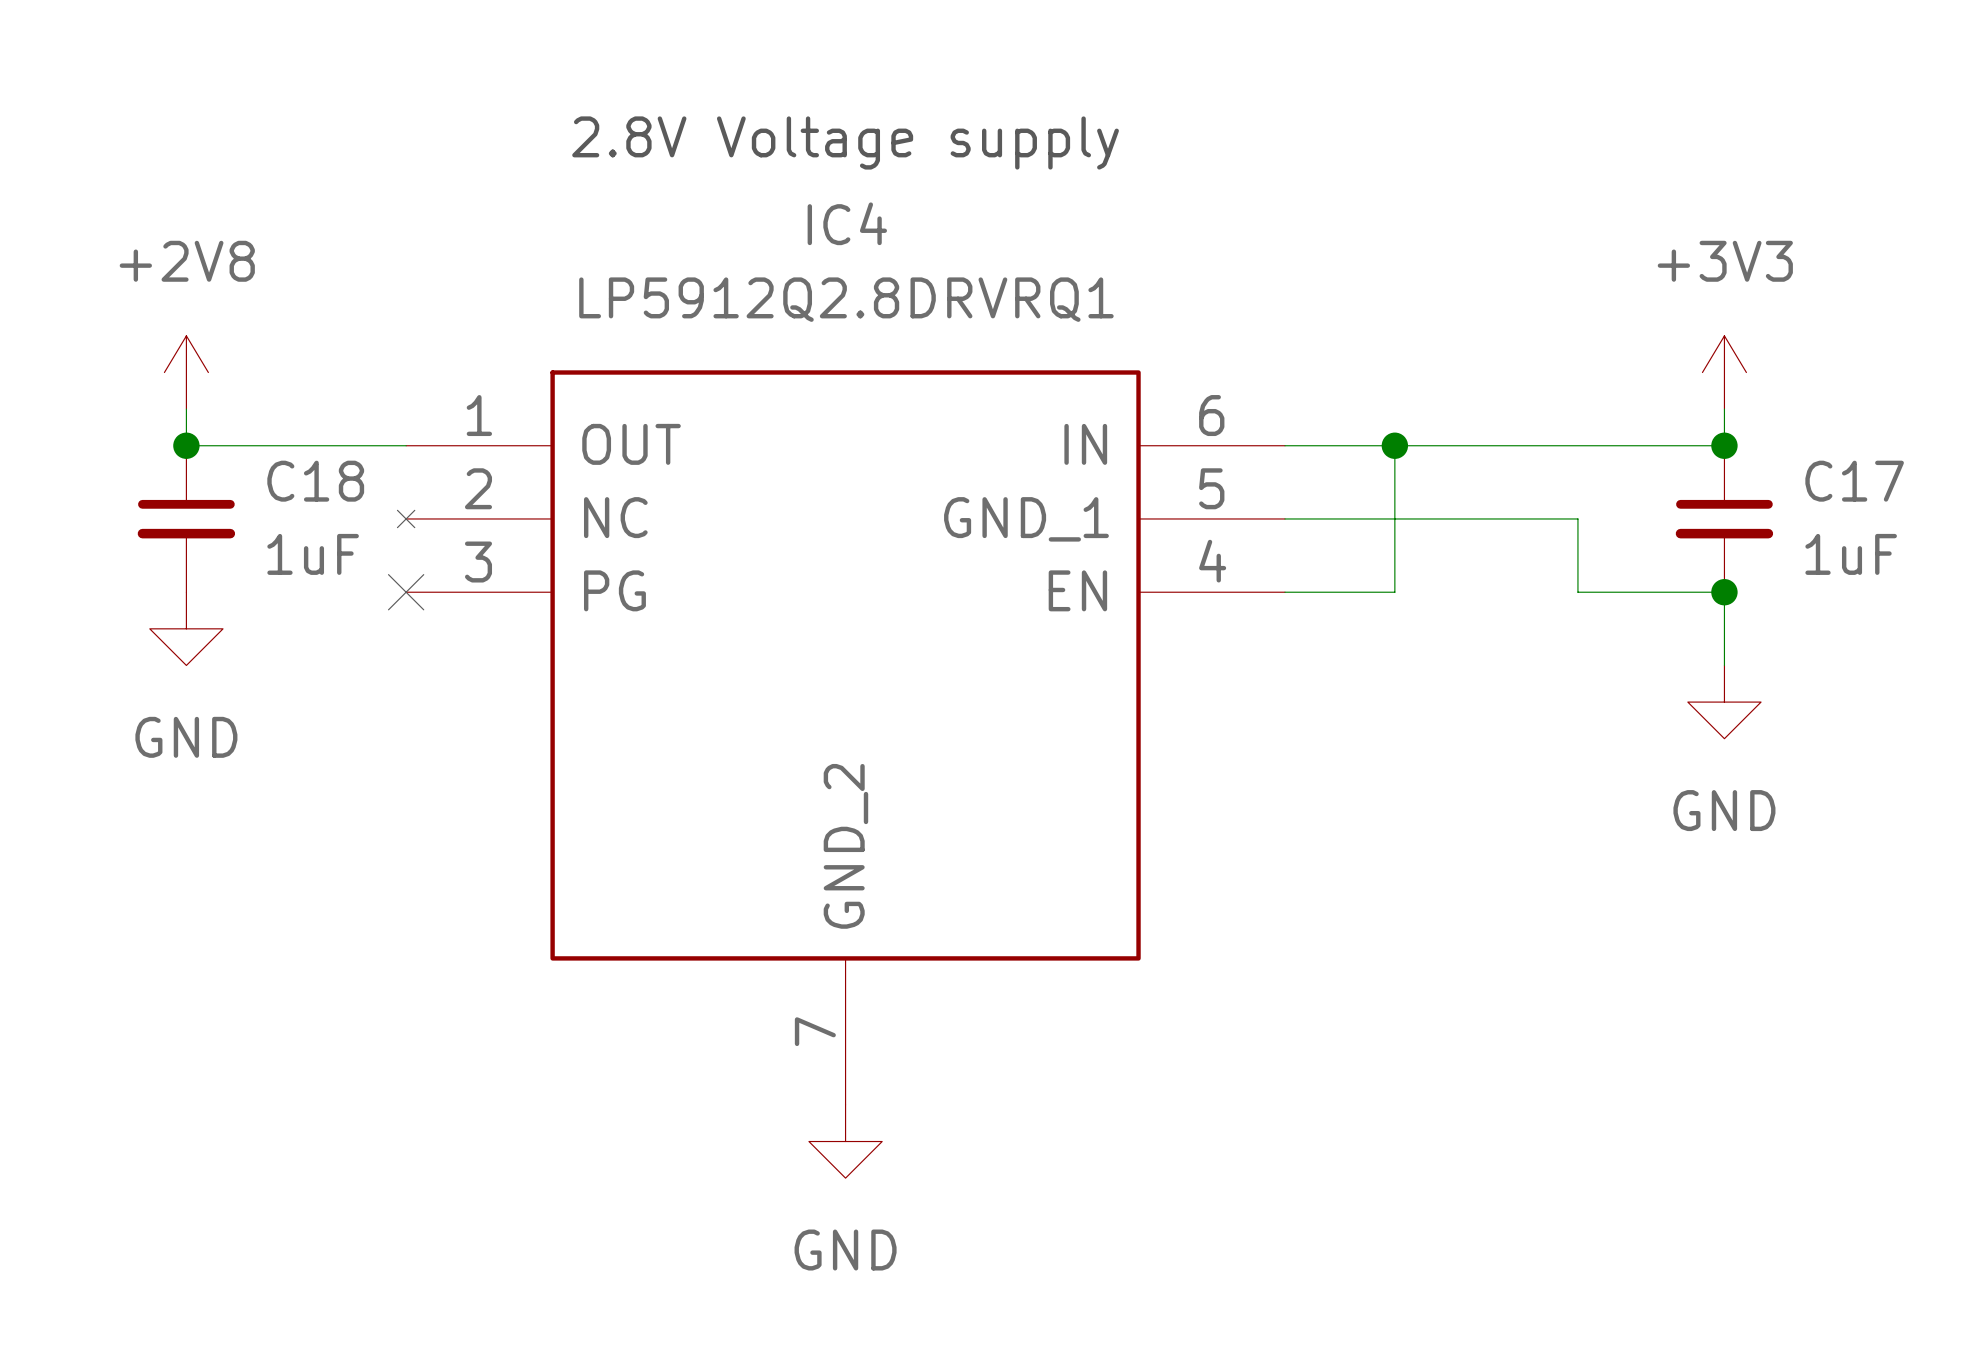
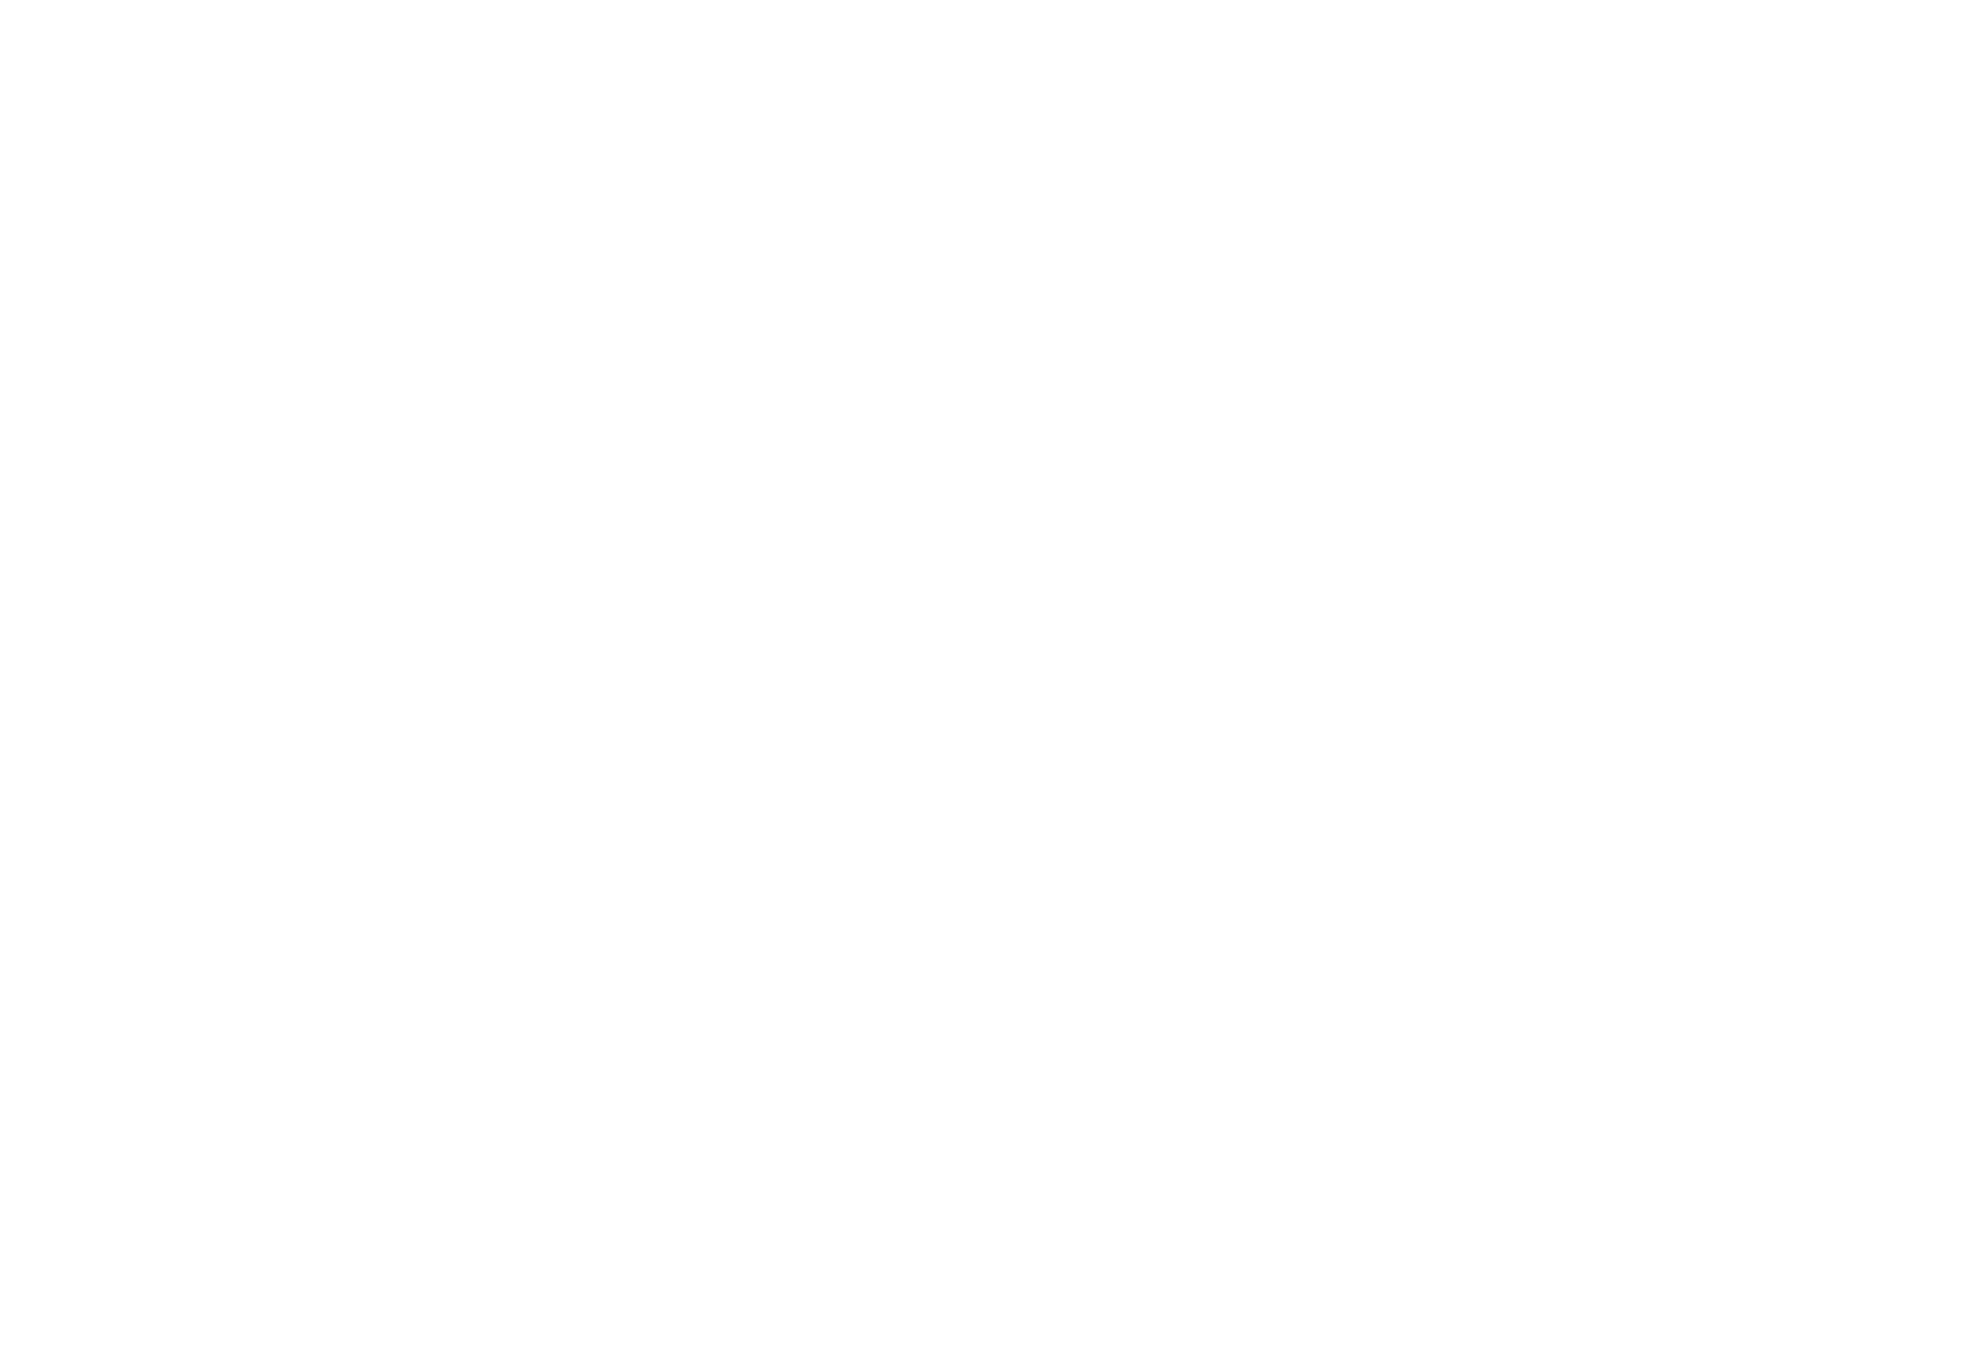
text: 2.8V Voltage supply (845, 142) -> none
power symbol: +2V8 (186, 372) -> none
power symbol: +3V3 (1724, 372) -> none
wire: (186, 409) (186, 445) (406, 445) -> none
wire: (1724, 409) (1724, 445) (1285, 445) -> none
junction: (186, 445) -> none
wire: (1394, 445) (1394, 592) (1285, 592) -> none
junction: (1394, 445) -> none
junction: (1724, 445) -> none
C18: 1uF (186, 518) -> none
wire: (1285, 518) (1577, 518) (1577, 592) (1724, 592) (1724, 665) -> none
C17: 1uF (1724, 518) -> none
no-connect mark: (406, 592) -> none
junction: (1724, 592) -> none
power symbol: GND (186, 628) -> none
power symbol: GND (1724, 702) -> none
IC4: LP5912Q2.8DRVRQ1 (841, 737) -> none
power symbol: GND (845, 1141) -> none

